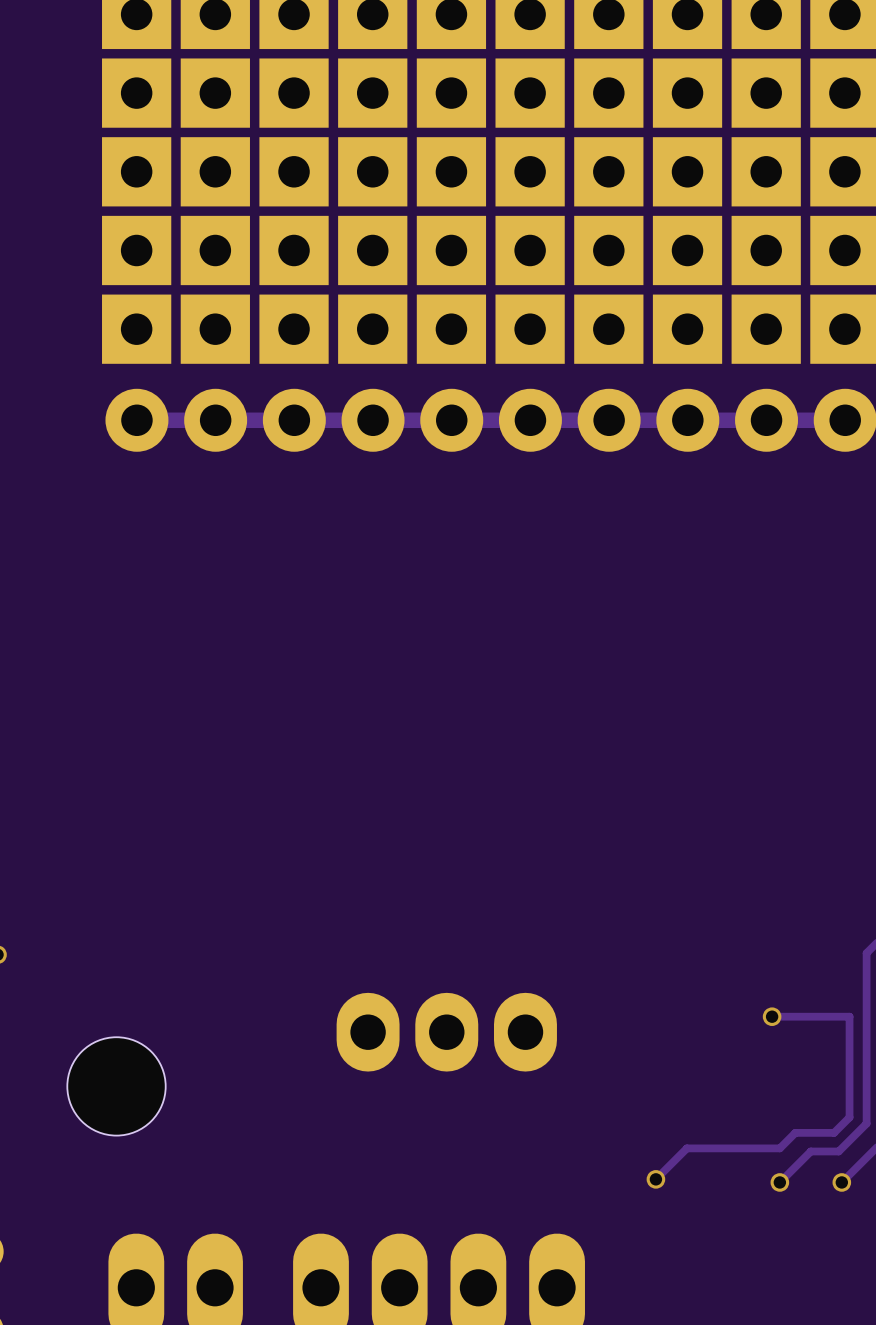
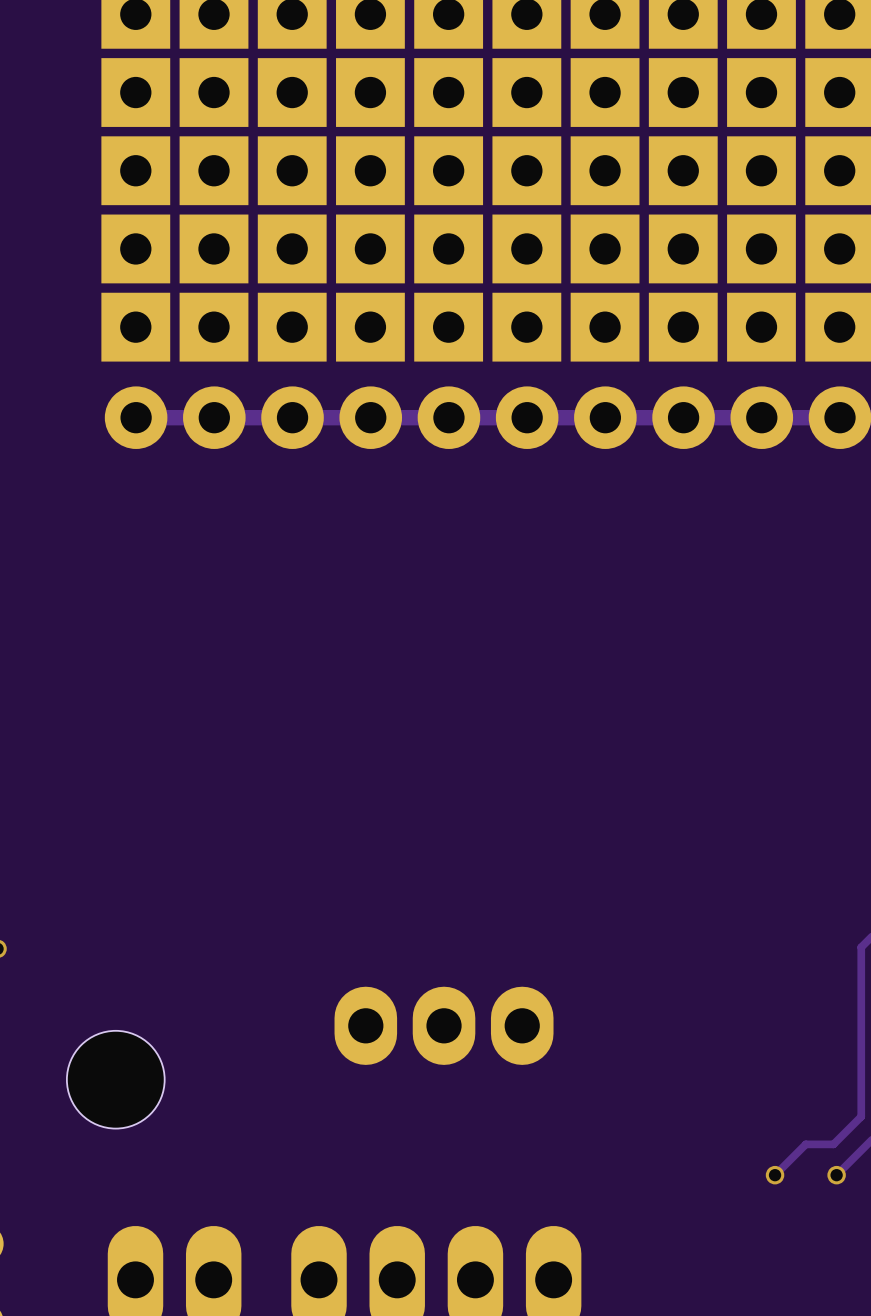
track: (772, 1016) (849, 1016) (849, 1117) (834, 1132) (795, 1132) (779, 1148) (686, 1148) (655, 1179) -> none
via: (772, 1016) -> none
via: (655, 1179) -> none

